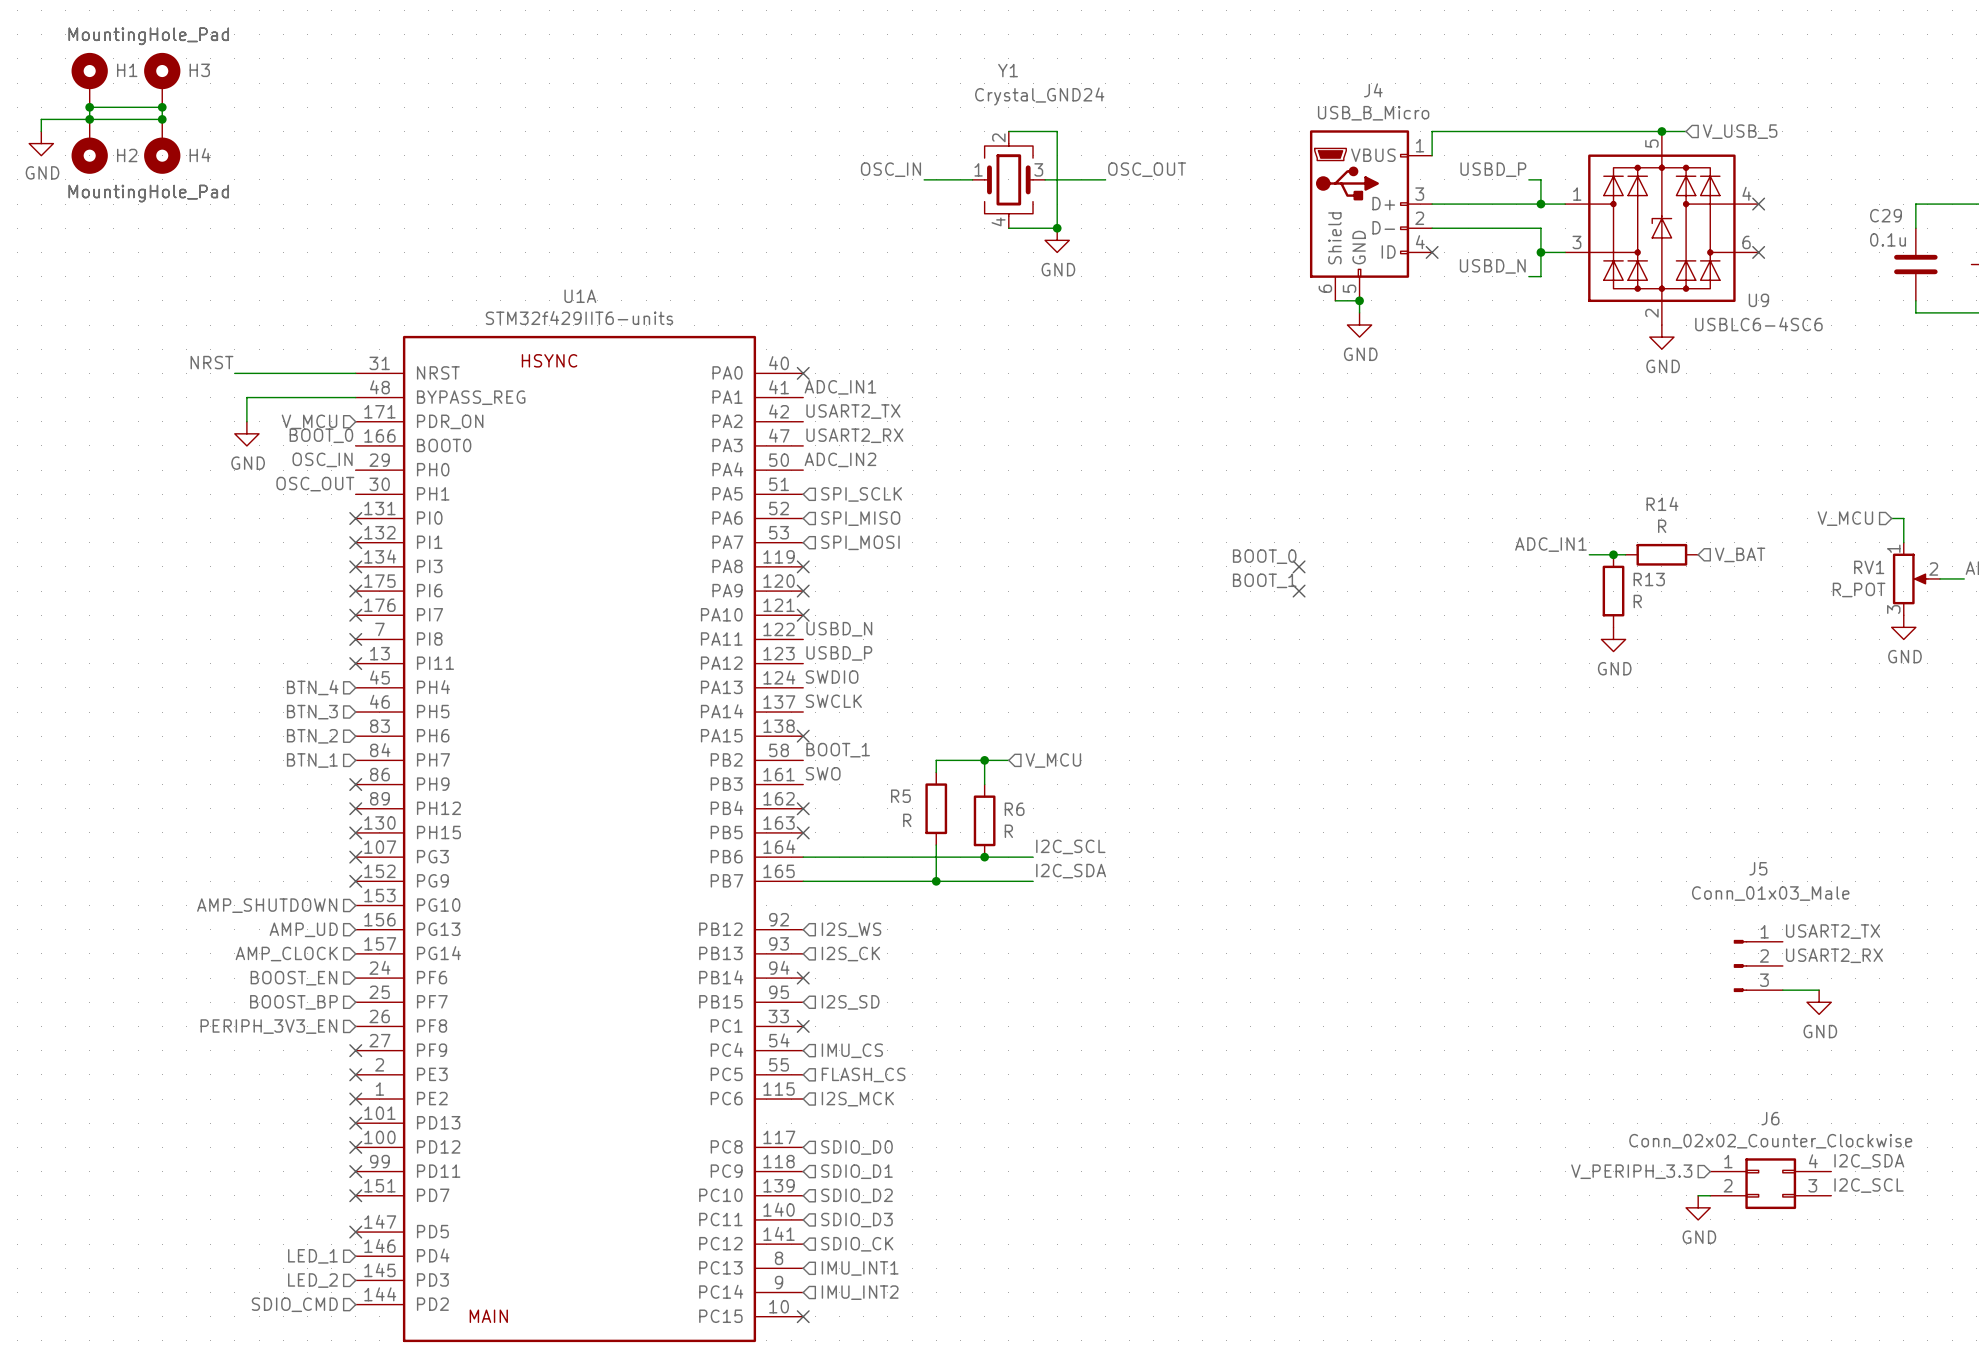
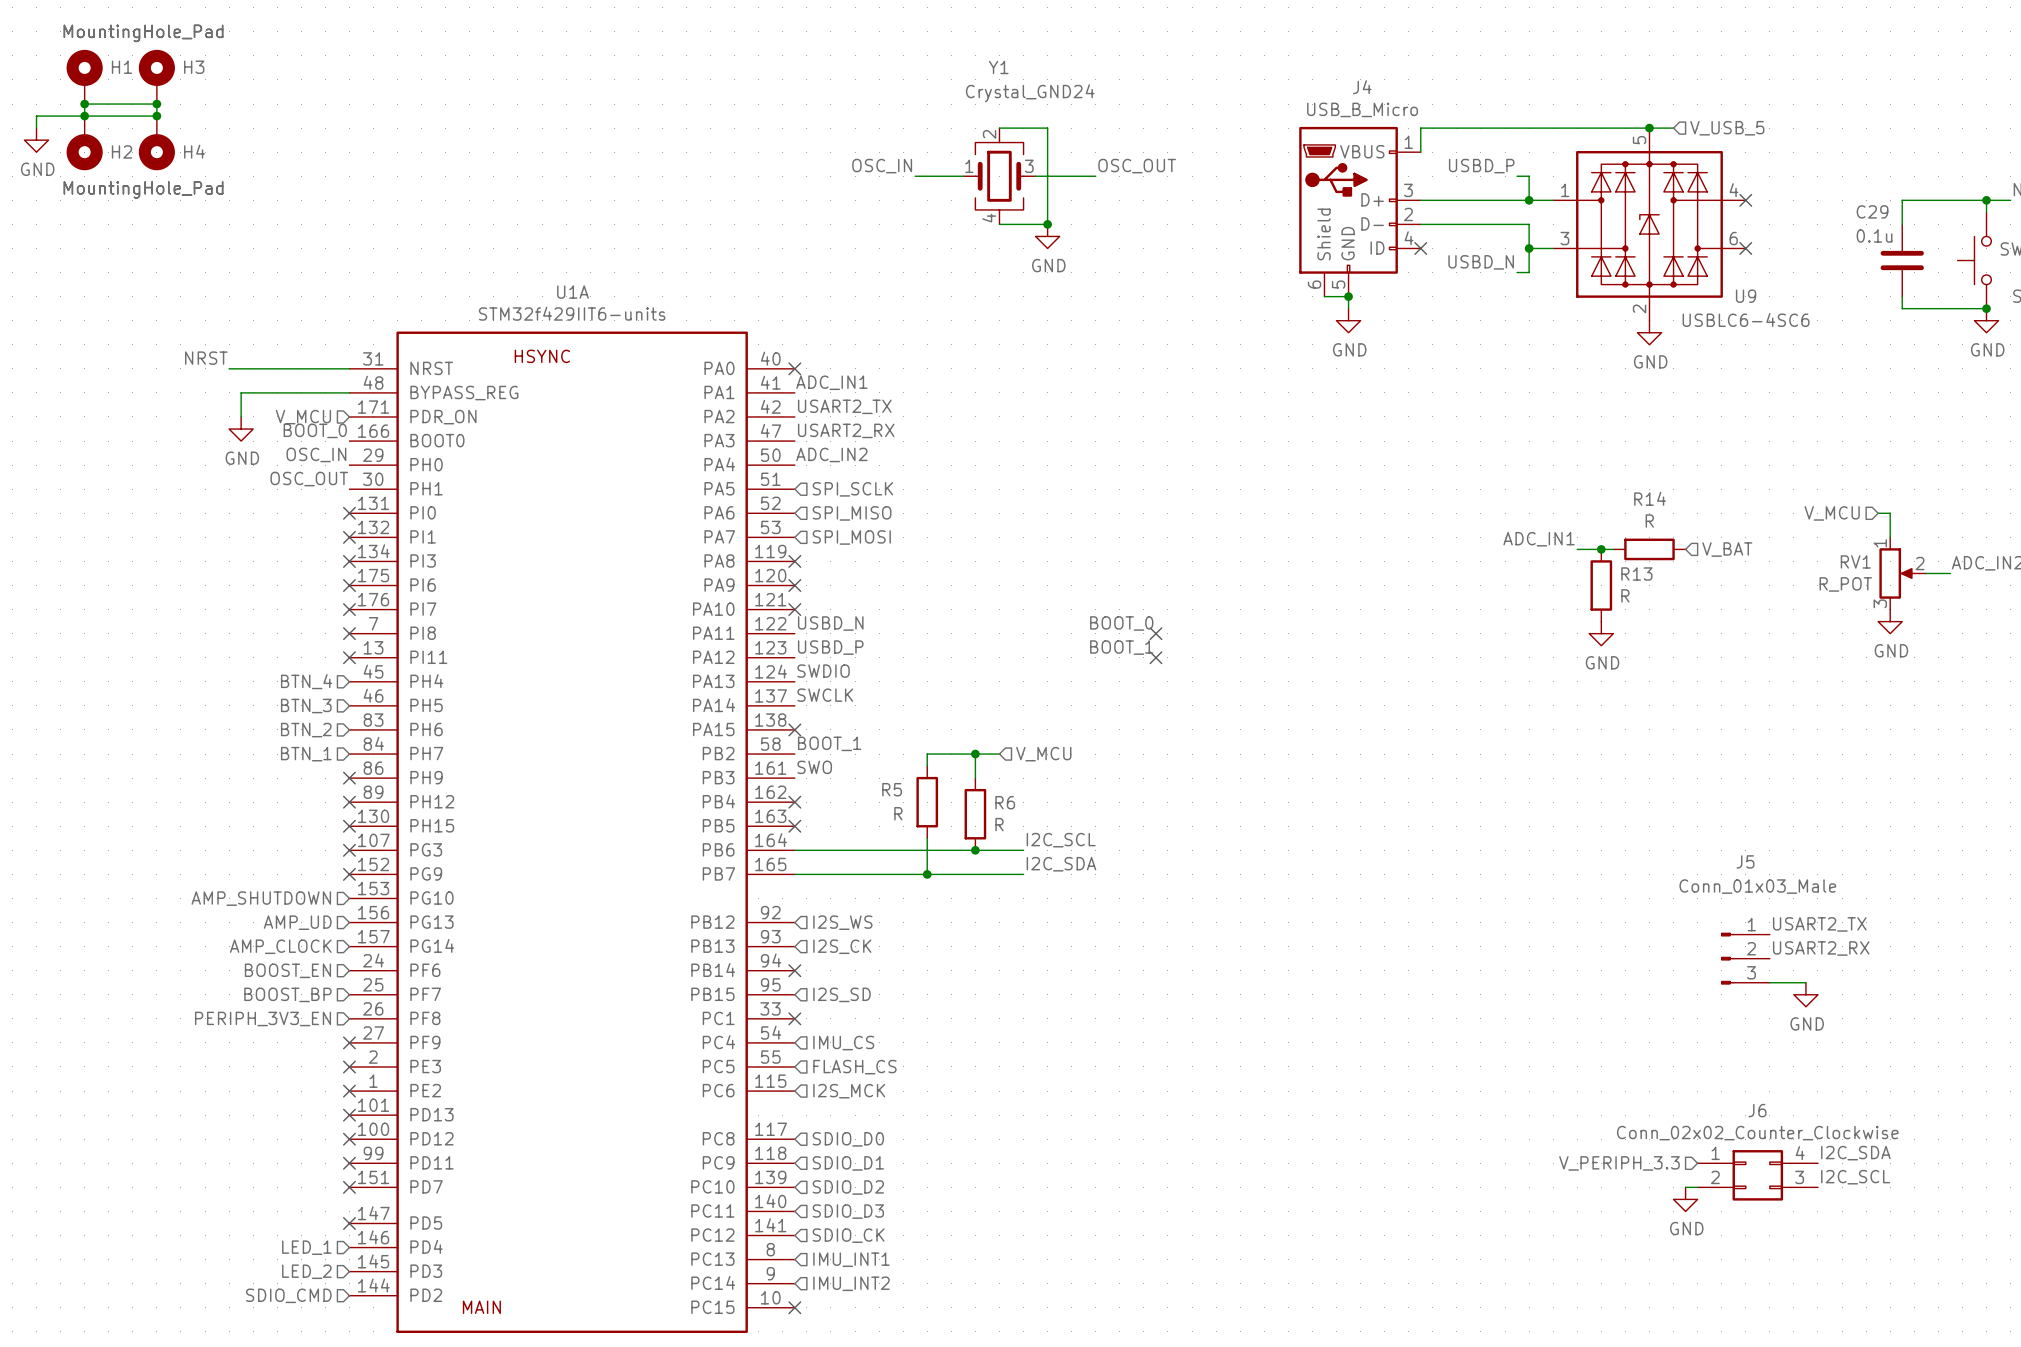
label position: BOOT_0 (1264, 556) -> BOOT_0 (1121, 623)
no-connect mark: (1299, 566) -> none
label position: BOOT_1 (1264, 580) -> BOOT_1 (1121, 647)
no-connect mark: (1299, 591) -> none
no-connect mark: none -> (1155, 633)
no-connect mark: none -> (1155, 657)

